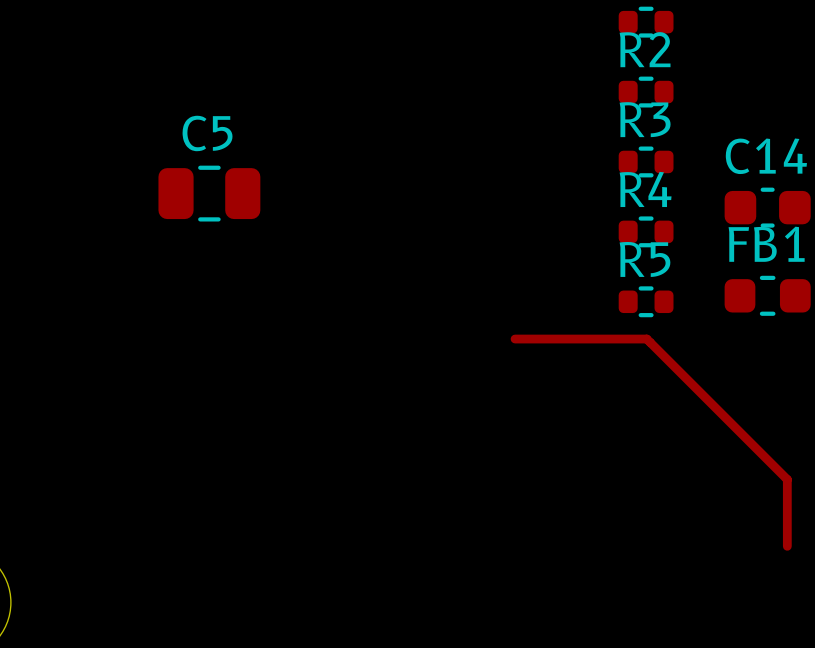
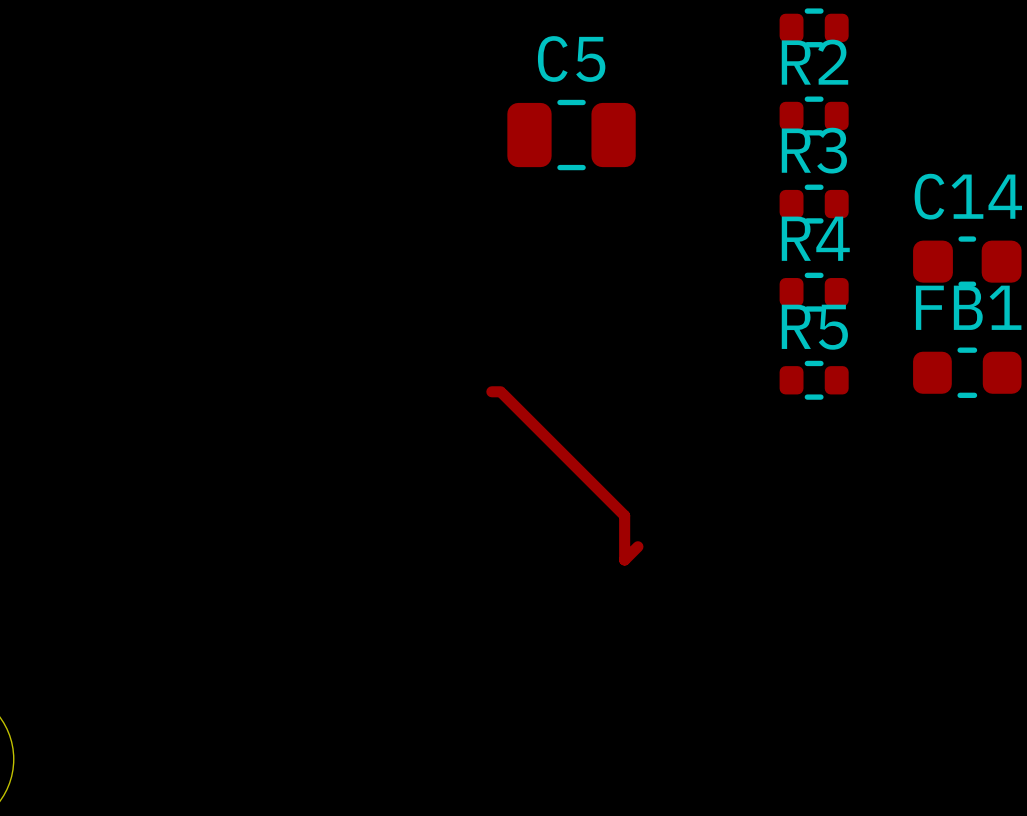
C5 position: (209, 193) -> (571, 135)
top track: none -> (491, 391) (500, 391)
top track: none -> (502, 394) (624, 515) (624, 560) (637, 546)
top track: (515, 339) (646, 339) (787, 479) (787, 546) -> none

